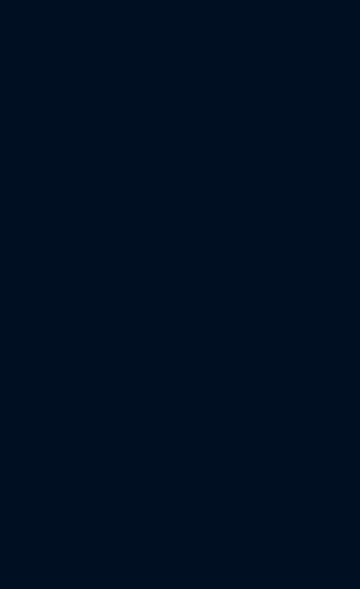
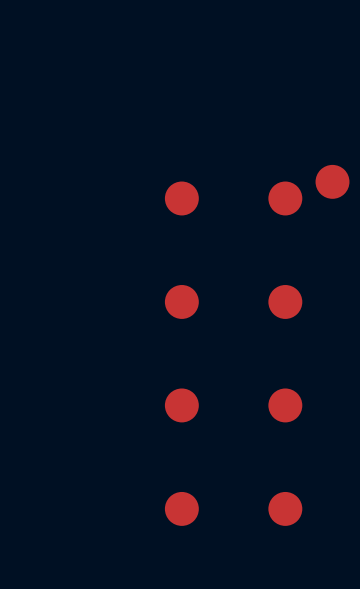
part: none -> (332, 181)
part: none -> (181, 198)
part: none -> (285, 198)
part: none -> (181, 301)
part: none -> (285, 301)
part: none -> (181, 405)
part: none -> (285, 405)
part: none -> (181, 508)
part: none -> (285, 508)

